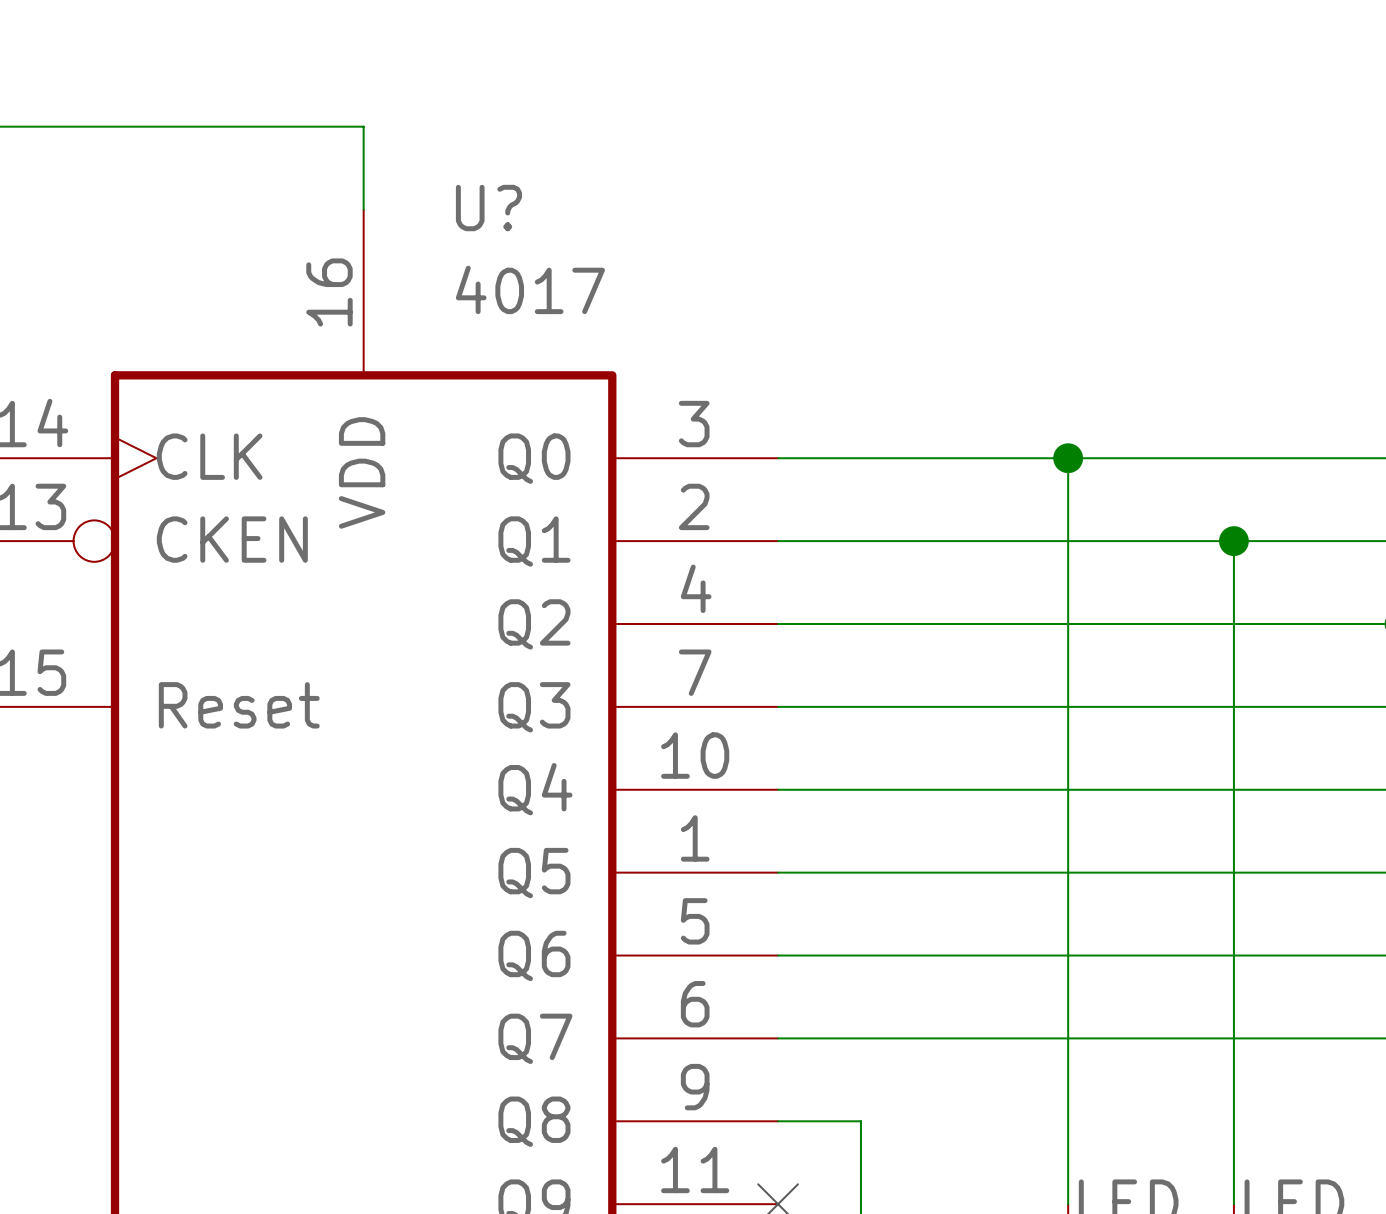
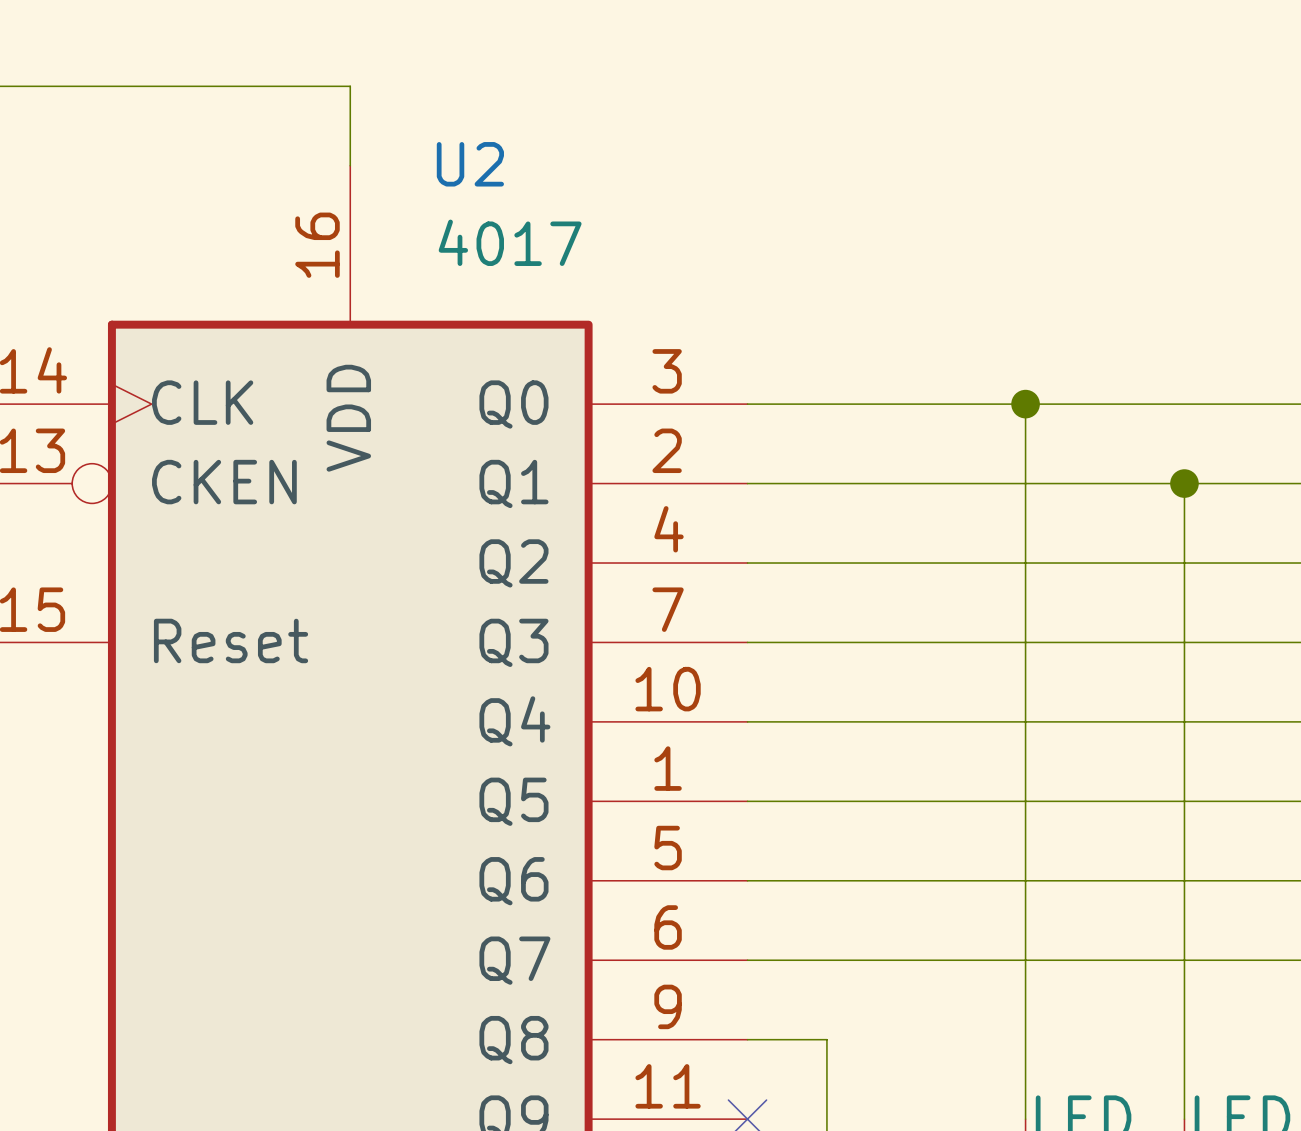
U? name: U? (488, 208) -> U2 (470, 164)

